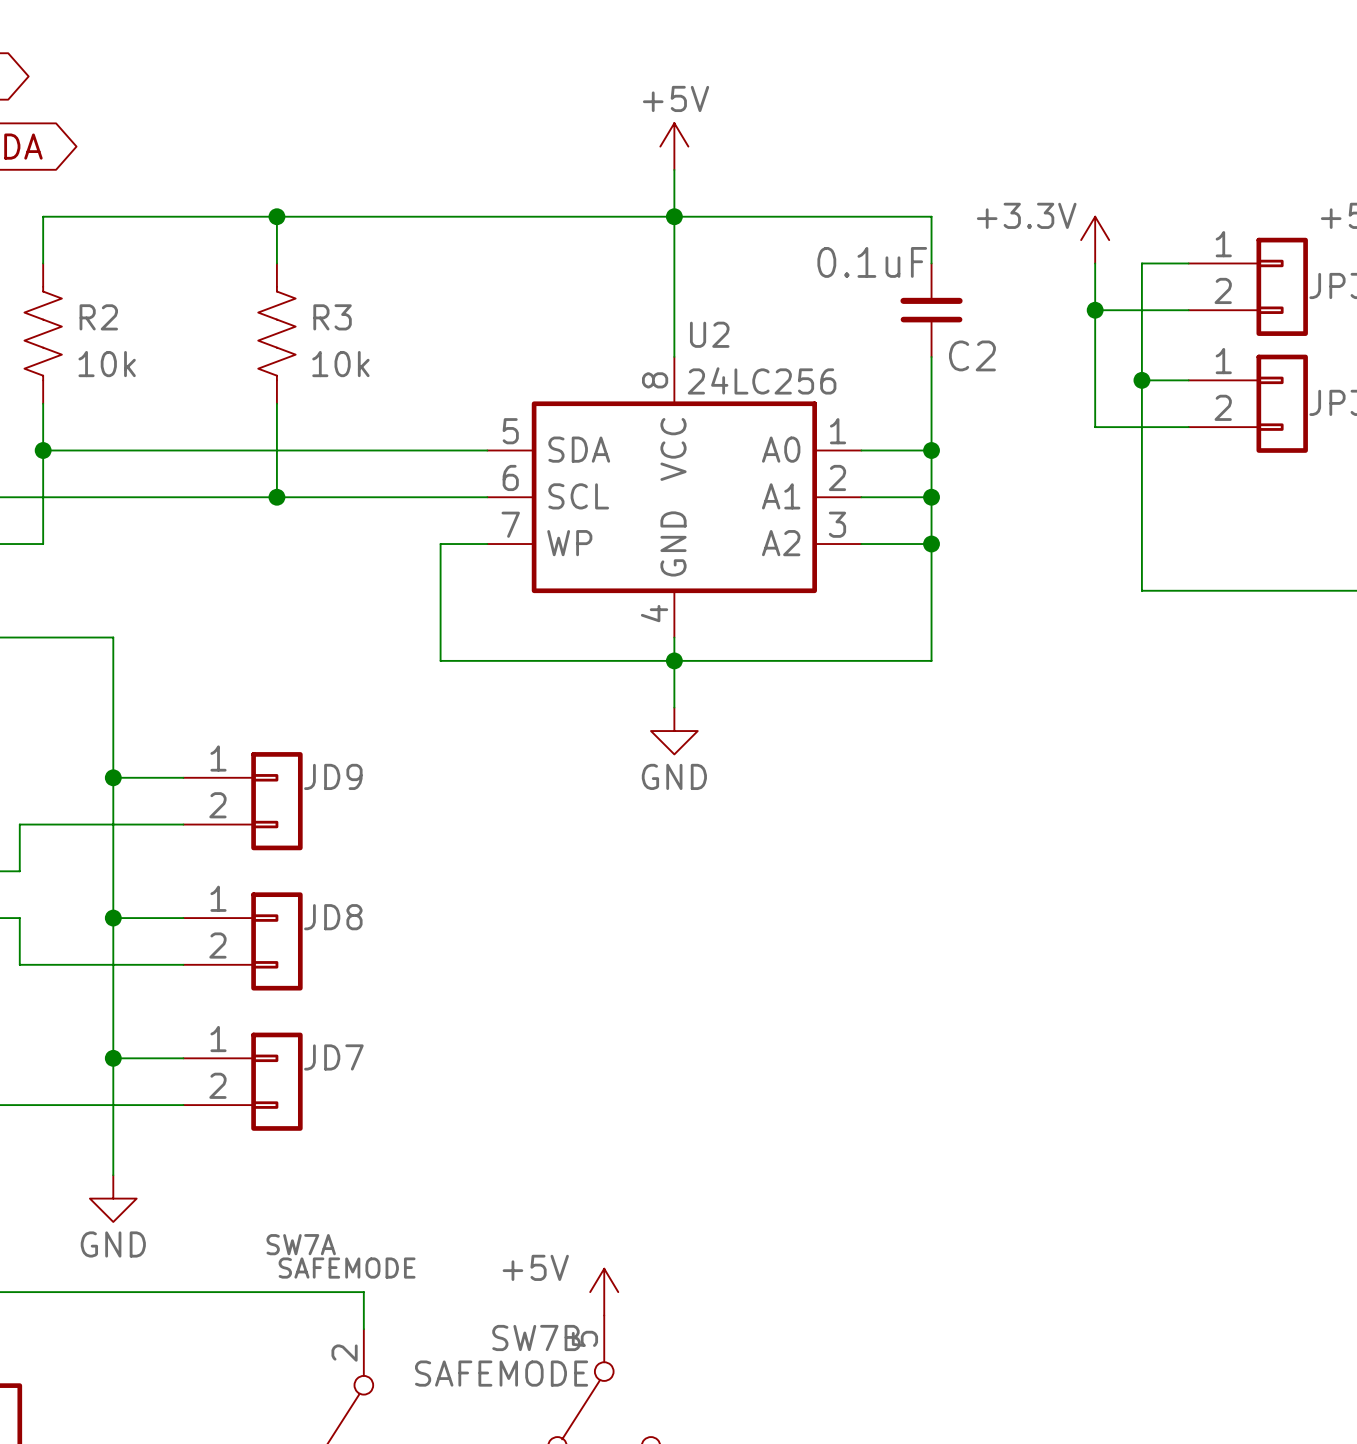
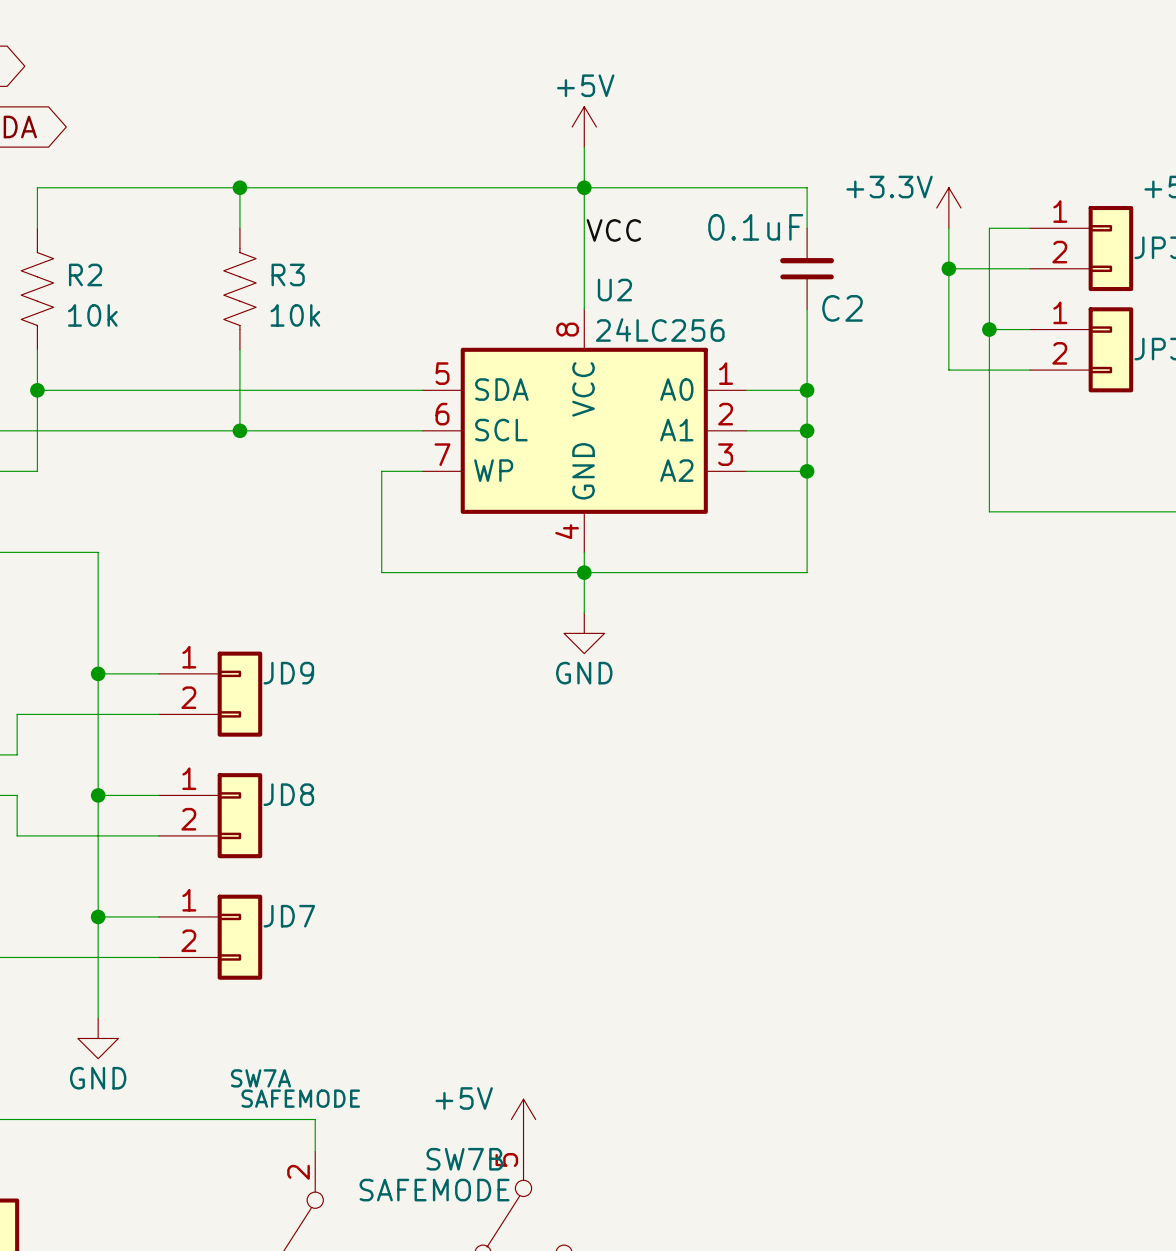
label: none -> VCC (613, 230)

